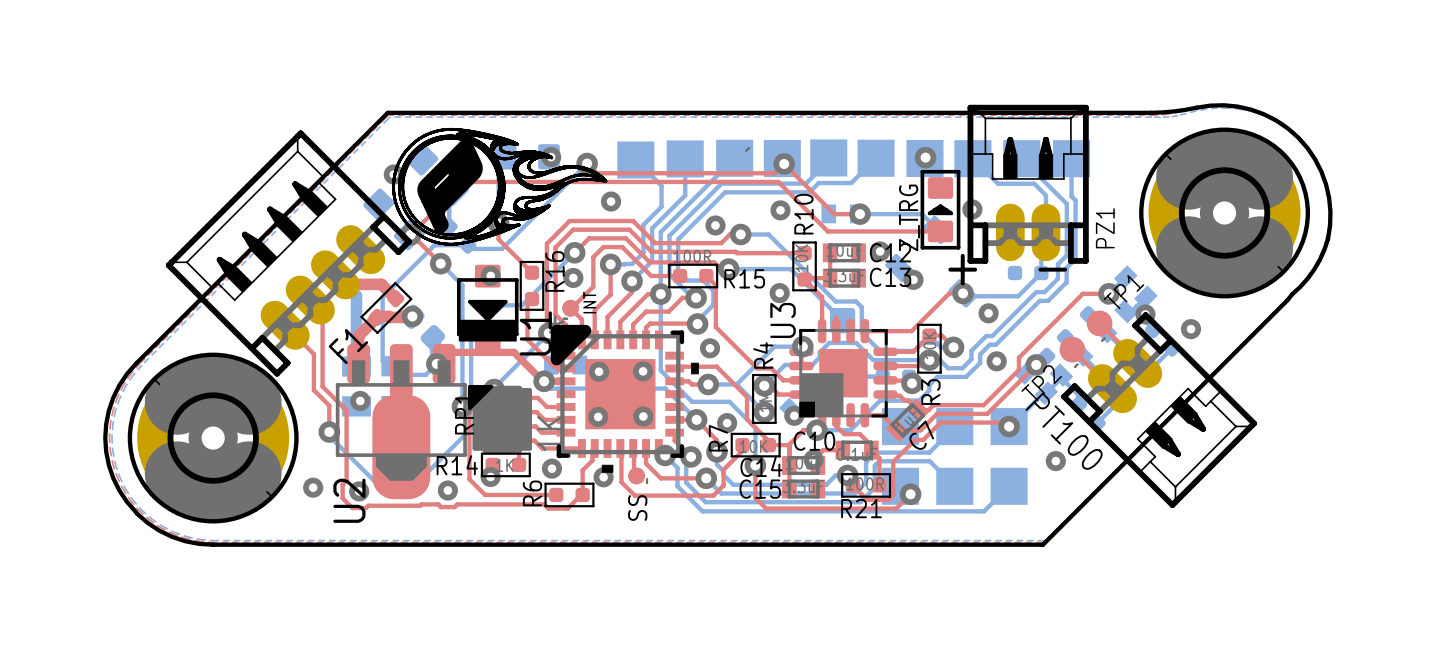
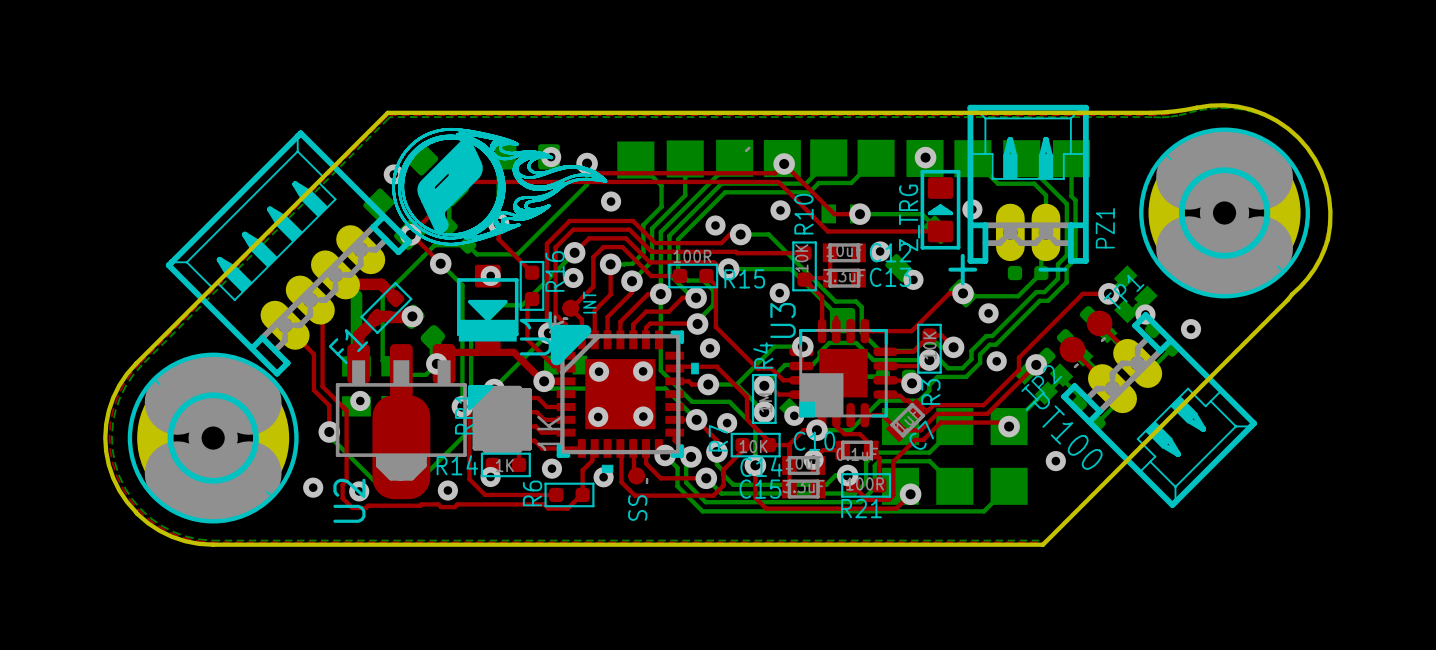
bottom track: (587, 163) (502, 248) (471, 248) -> (587, 163) (587, 184) (517, 254) (476, 254) (471, 248)

